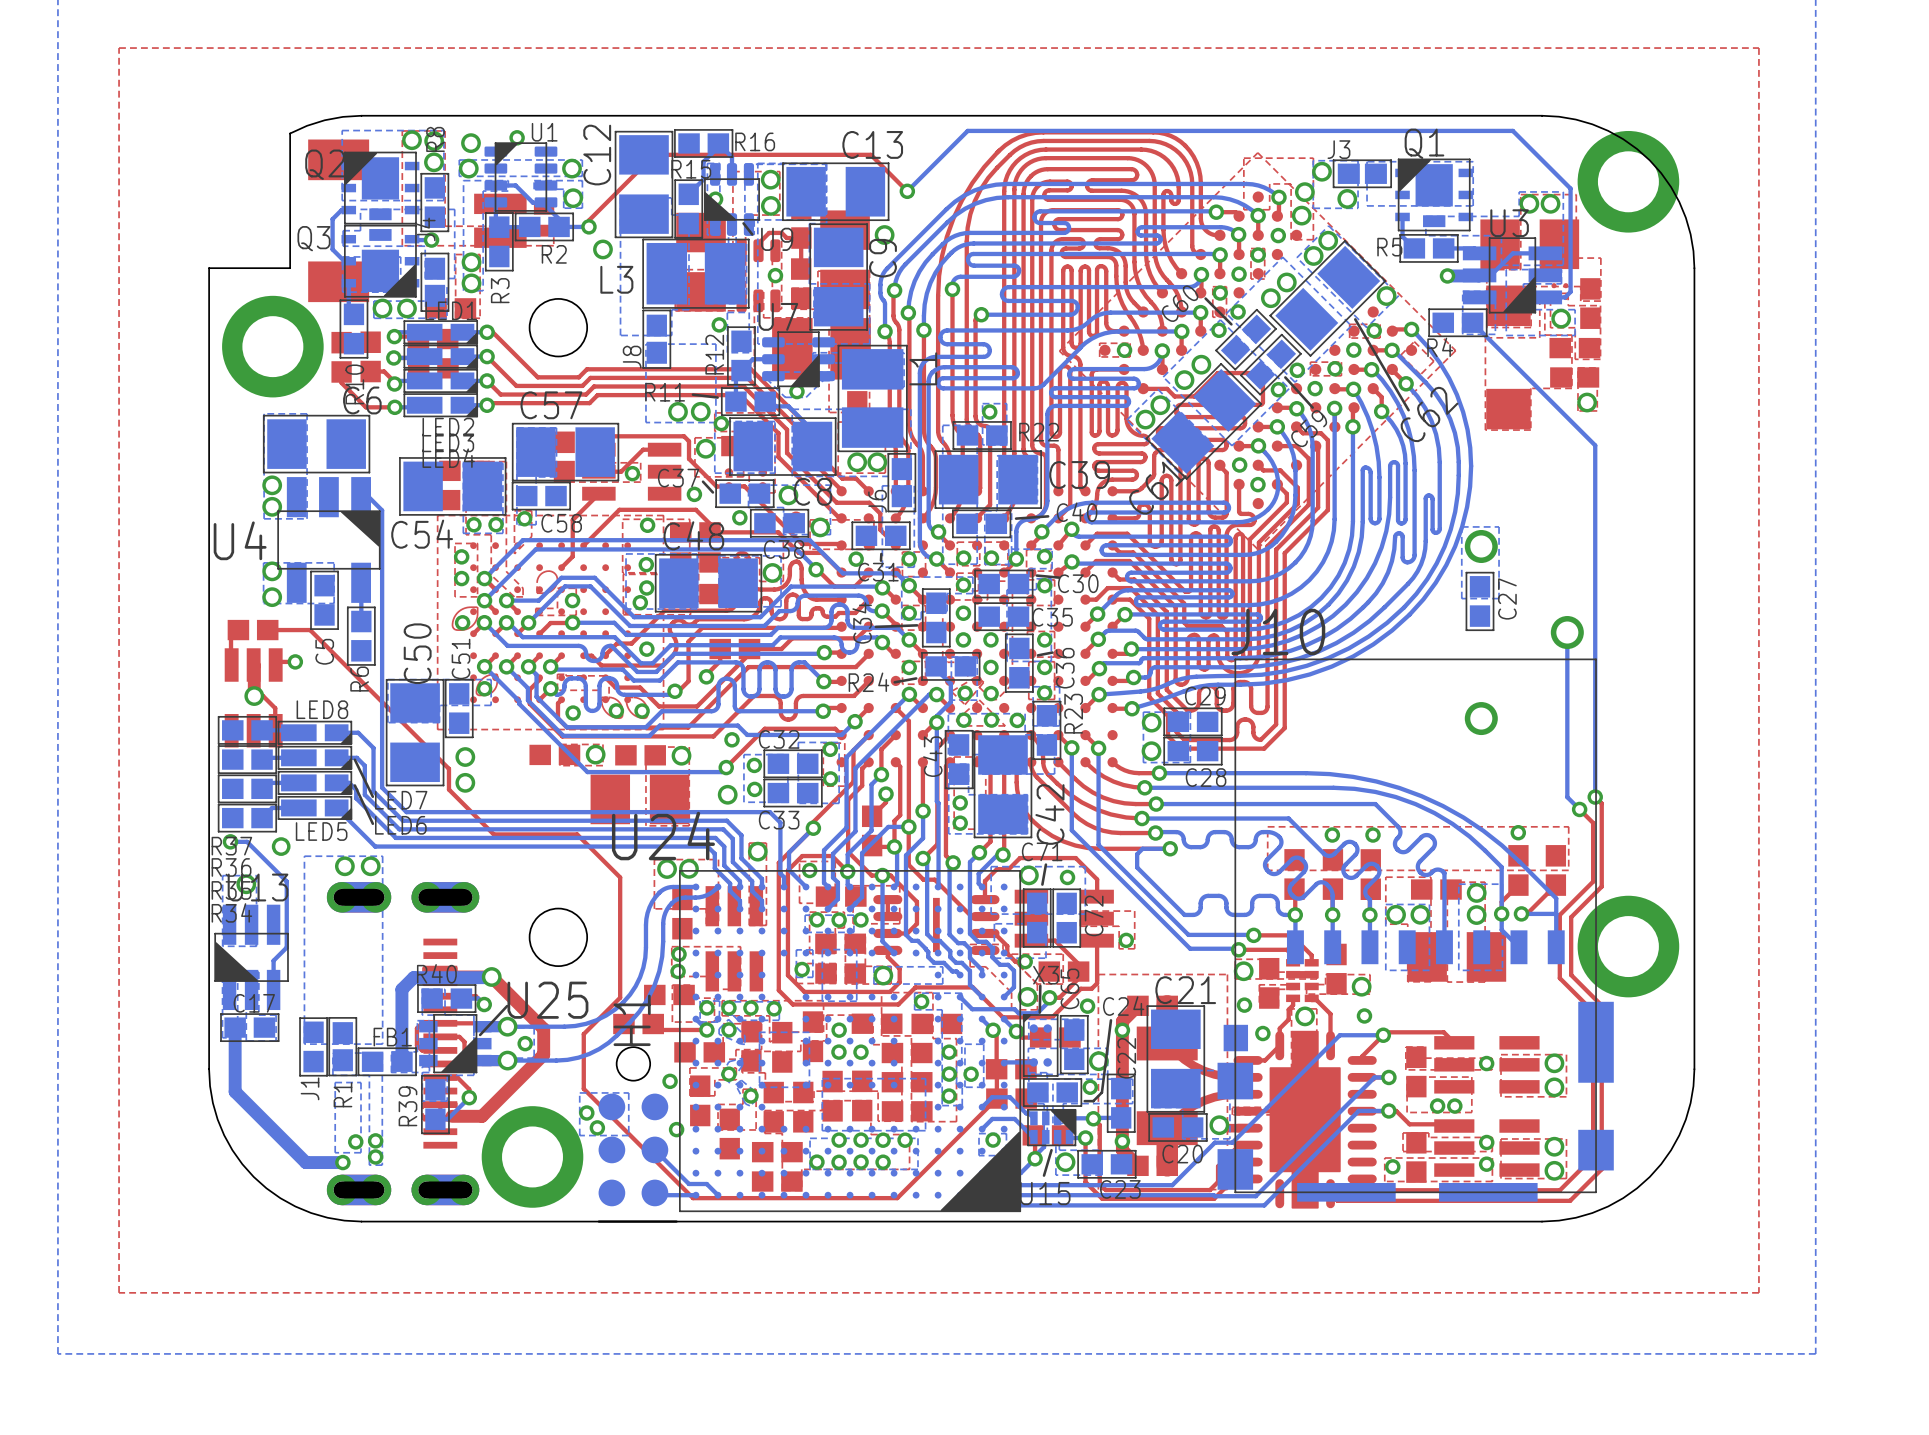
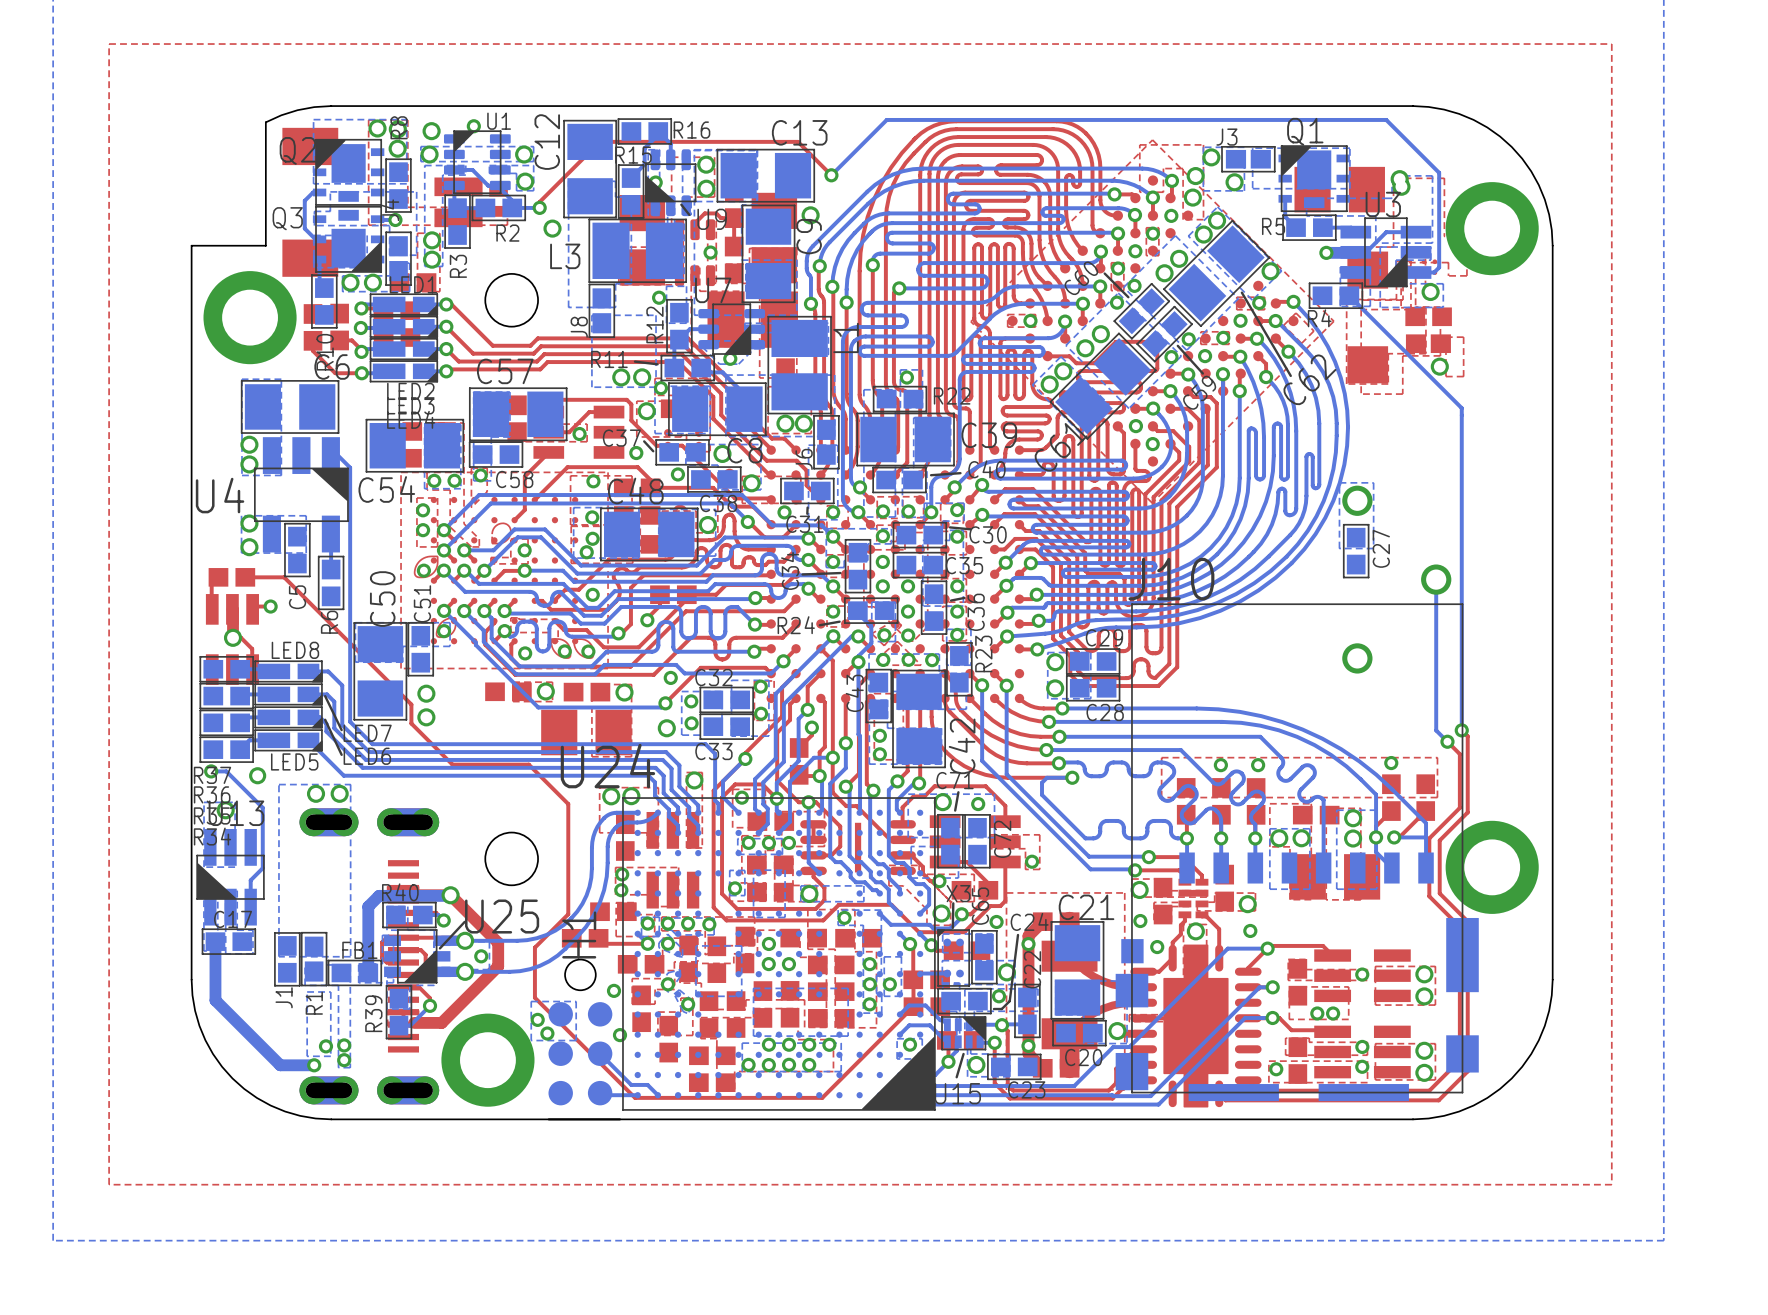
via position: (1628, 181) -> (1492, 228)
via position: (1550, 203) -> (1399, 179)
part position: (1529, 244) -> (1339, 189)
top zone outline: none -> (1410, 261) (1396, 261) (1396, 299) (1346, 299) (1346, 383) (1388, 383) (1388, 353) (1425, 353) (1425, 307) (1401, 307) (1401, 266) (1410, 266) (1410, 261)
top zone outline: (1568, 293) (1550, 293) (1550, 327) (1575, 327) (1575, 359) (1600, 359) (1600, 305) (1568, 305) (1568, 293) -> none
part: (1590, 303) -> none
part position: (1574, 348) -> (1428, 316)
part position: (1508, 357) -> (1367, 317)
part position: (1574, 377) -> (1428, 343)
via position: (1587, 402) -> (1439, 366)

